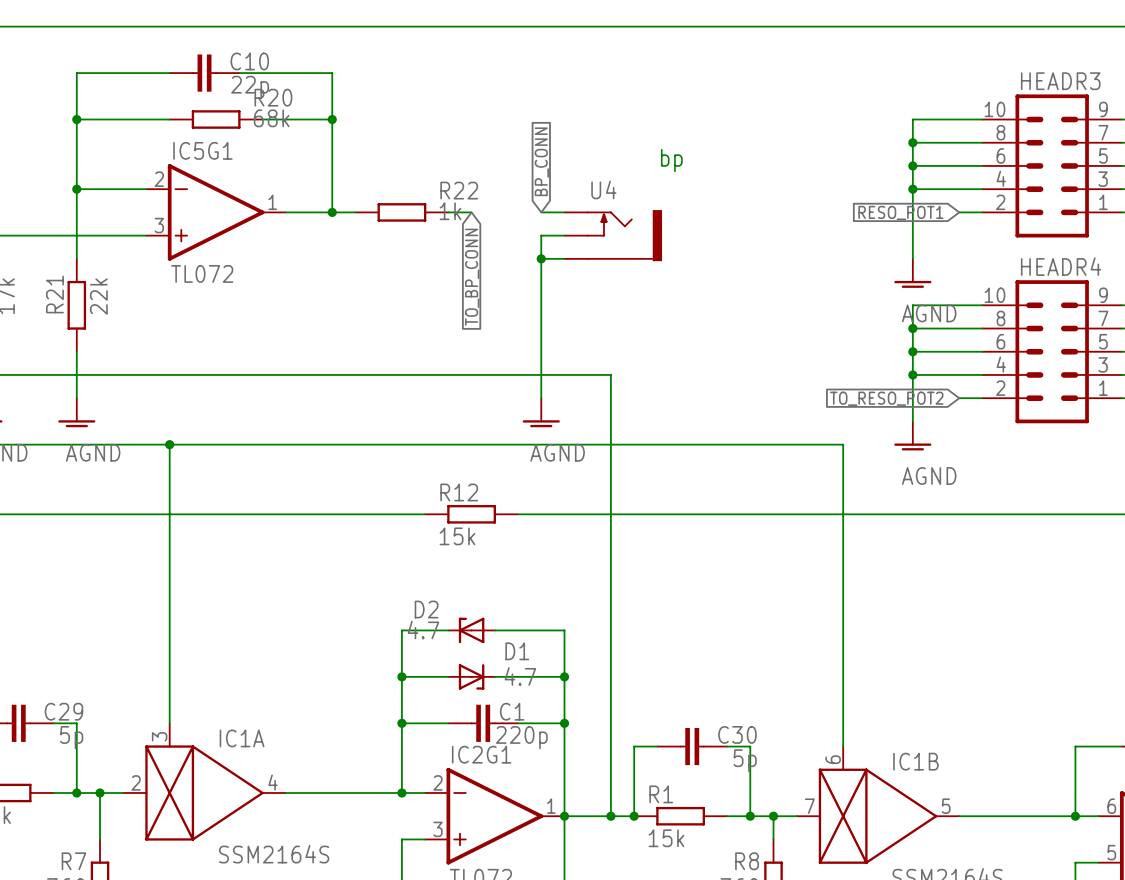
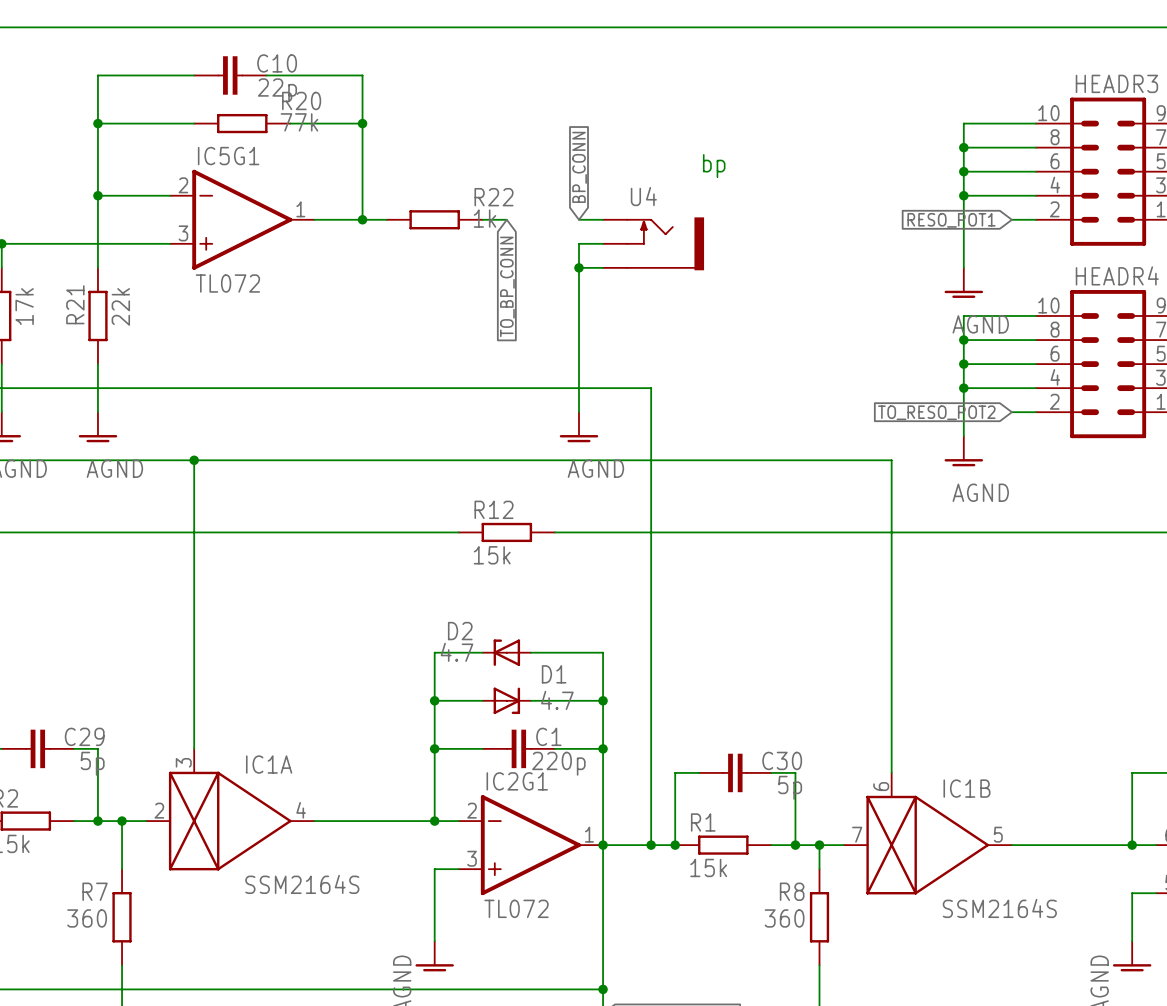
R20 value: 68k (271, 118) -> 77k (299, 122)

